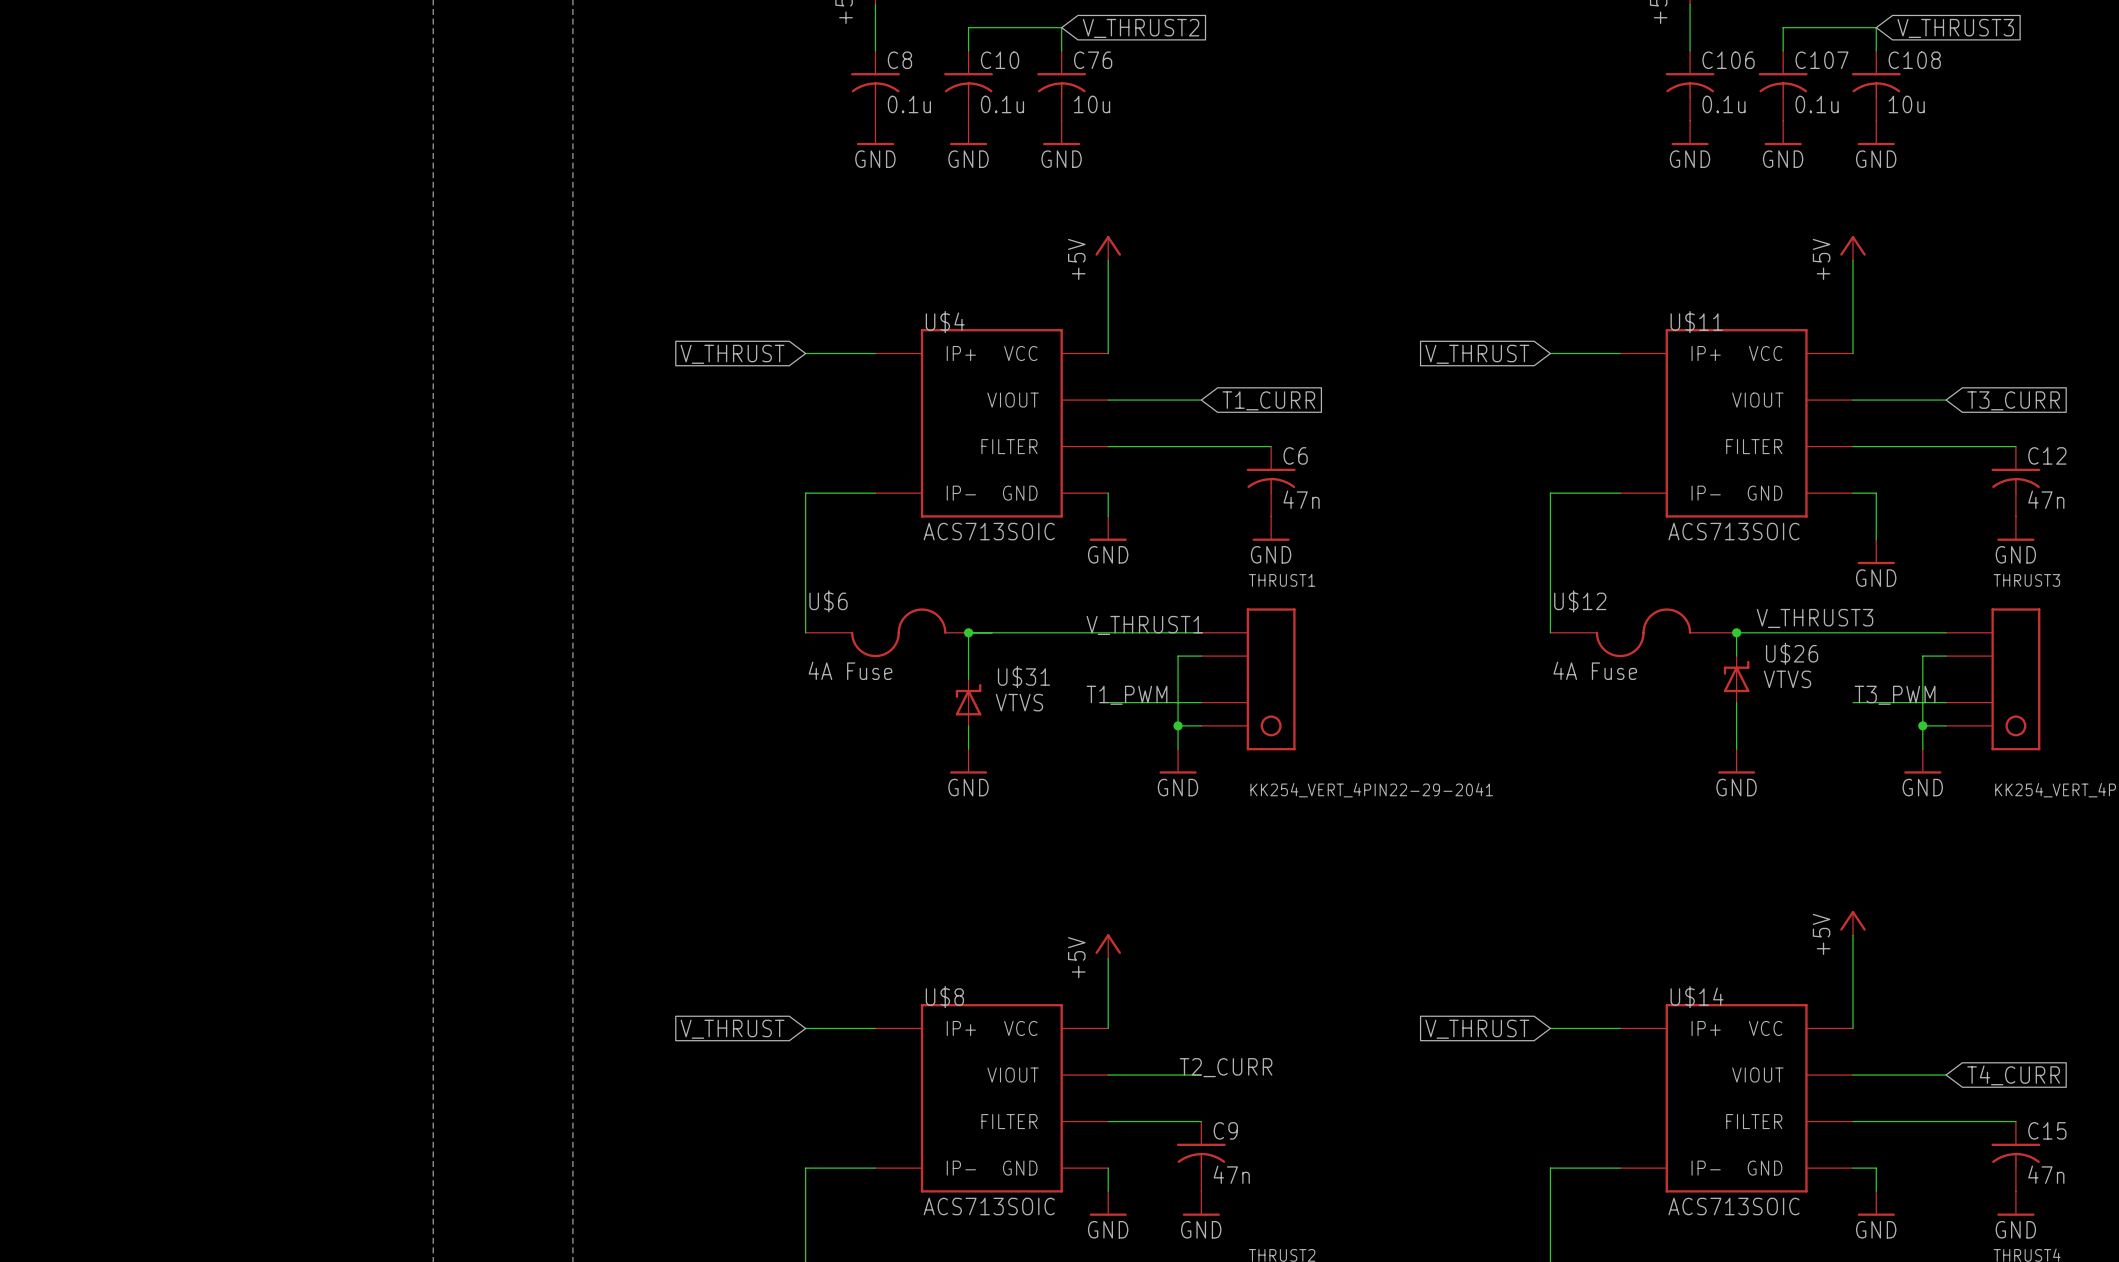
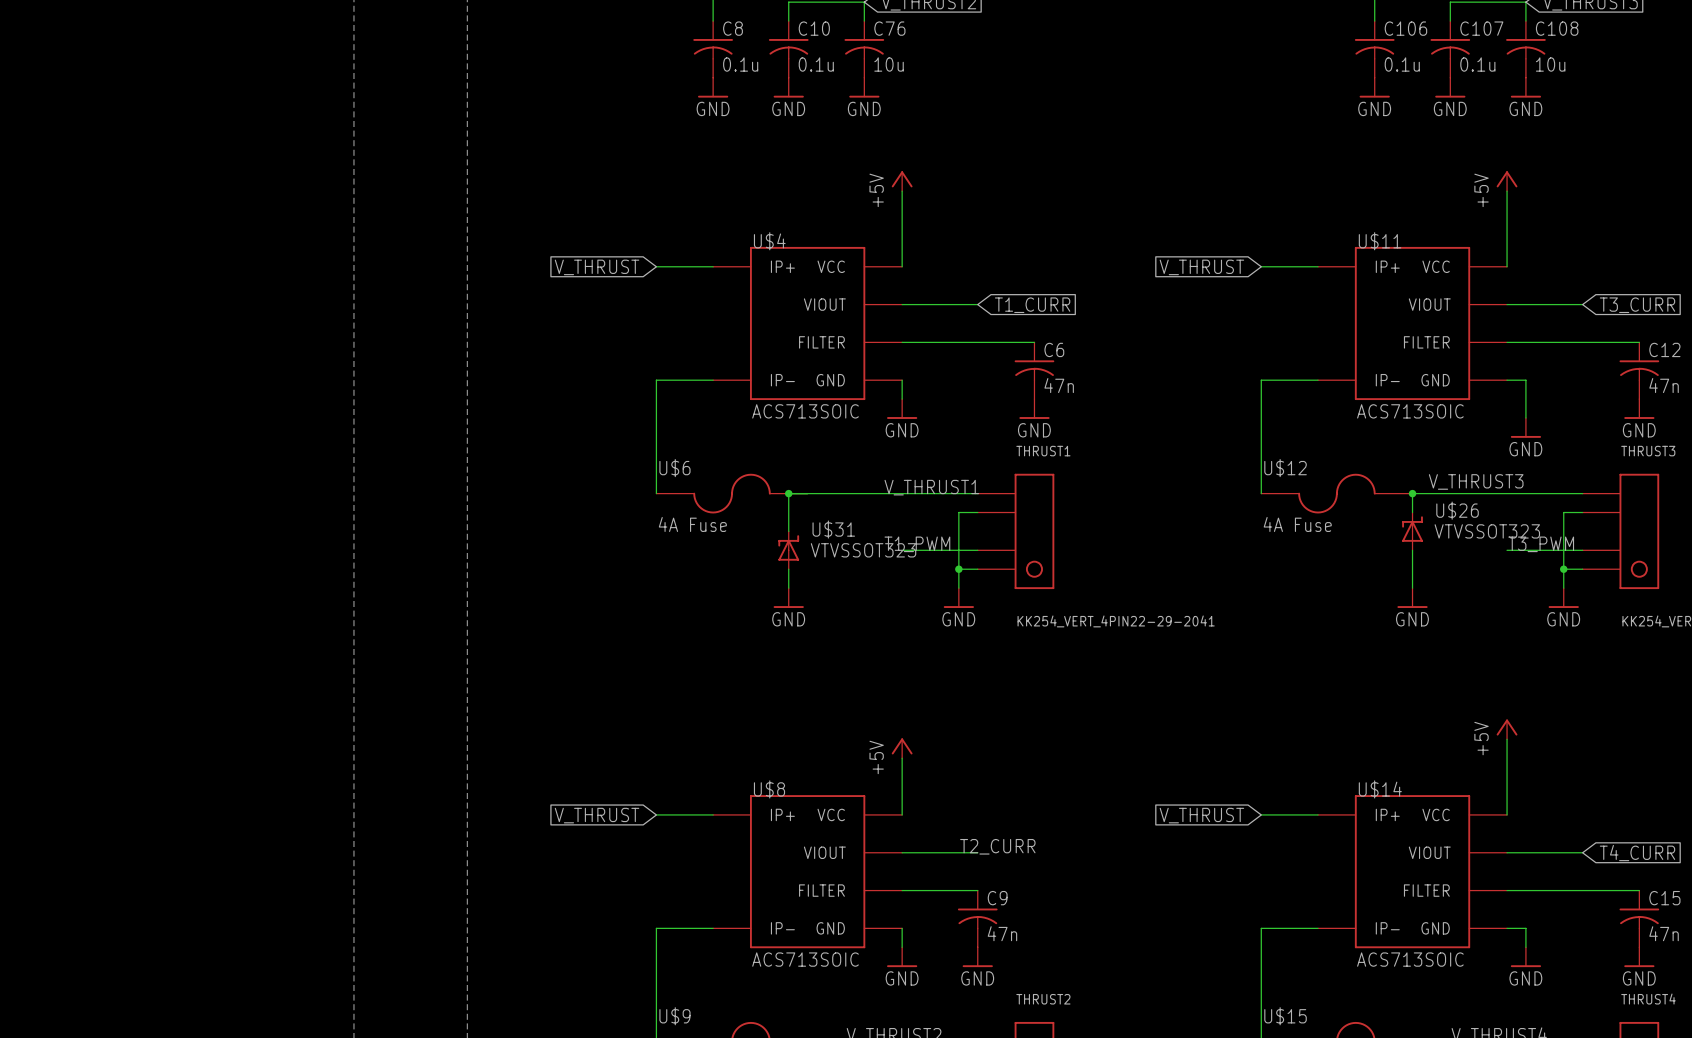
U$26 value: VTVS (1787, 679) -> VTVSSOT323 (1487, 531)
U$31 value: VTVS (1019, 702) -> VTVSSOT323 (863, 550)

